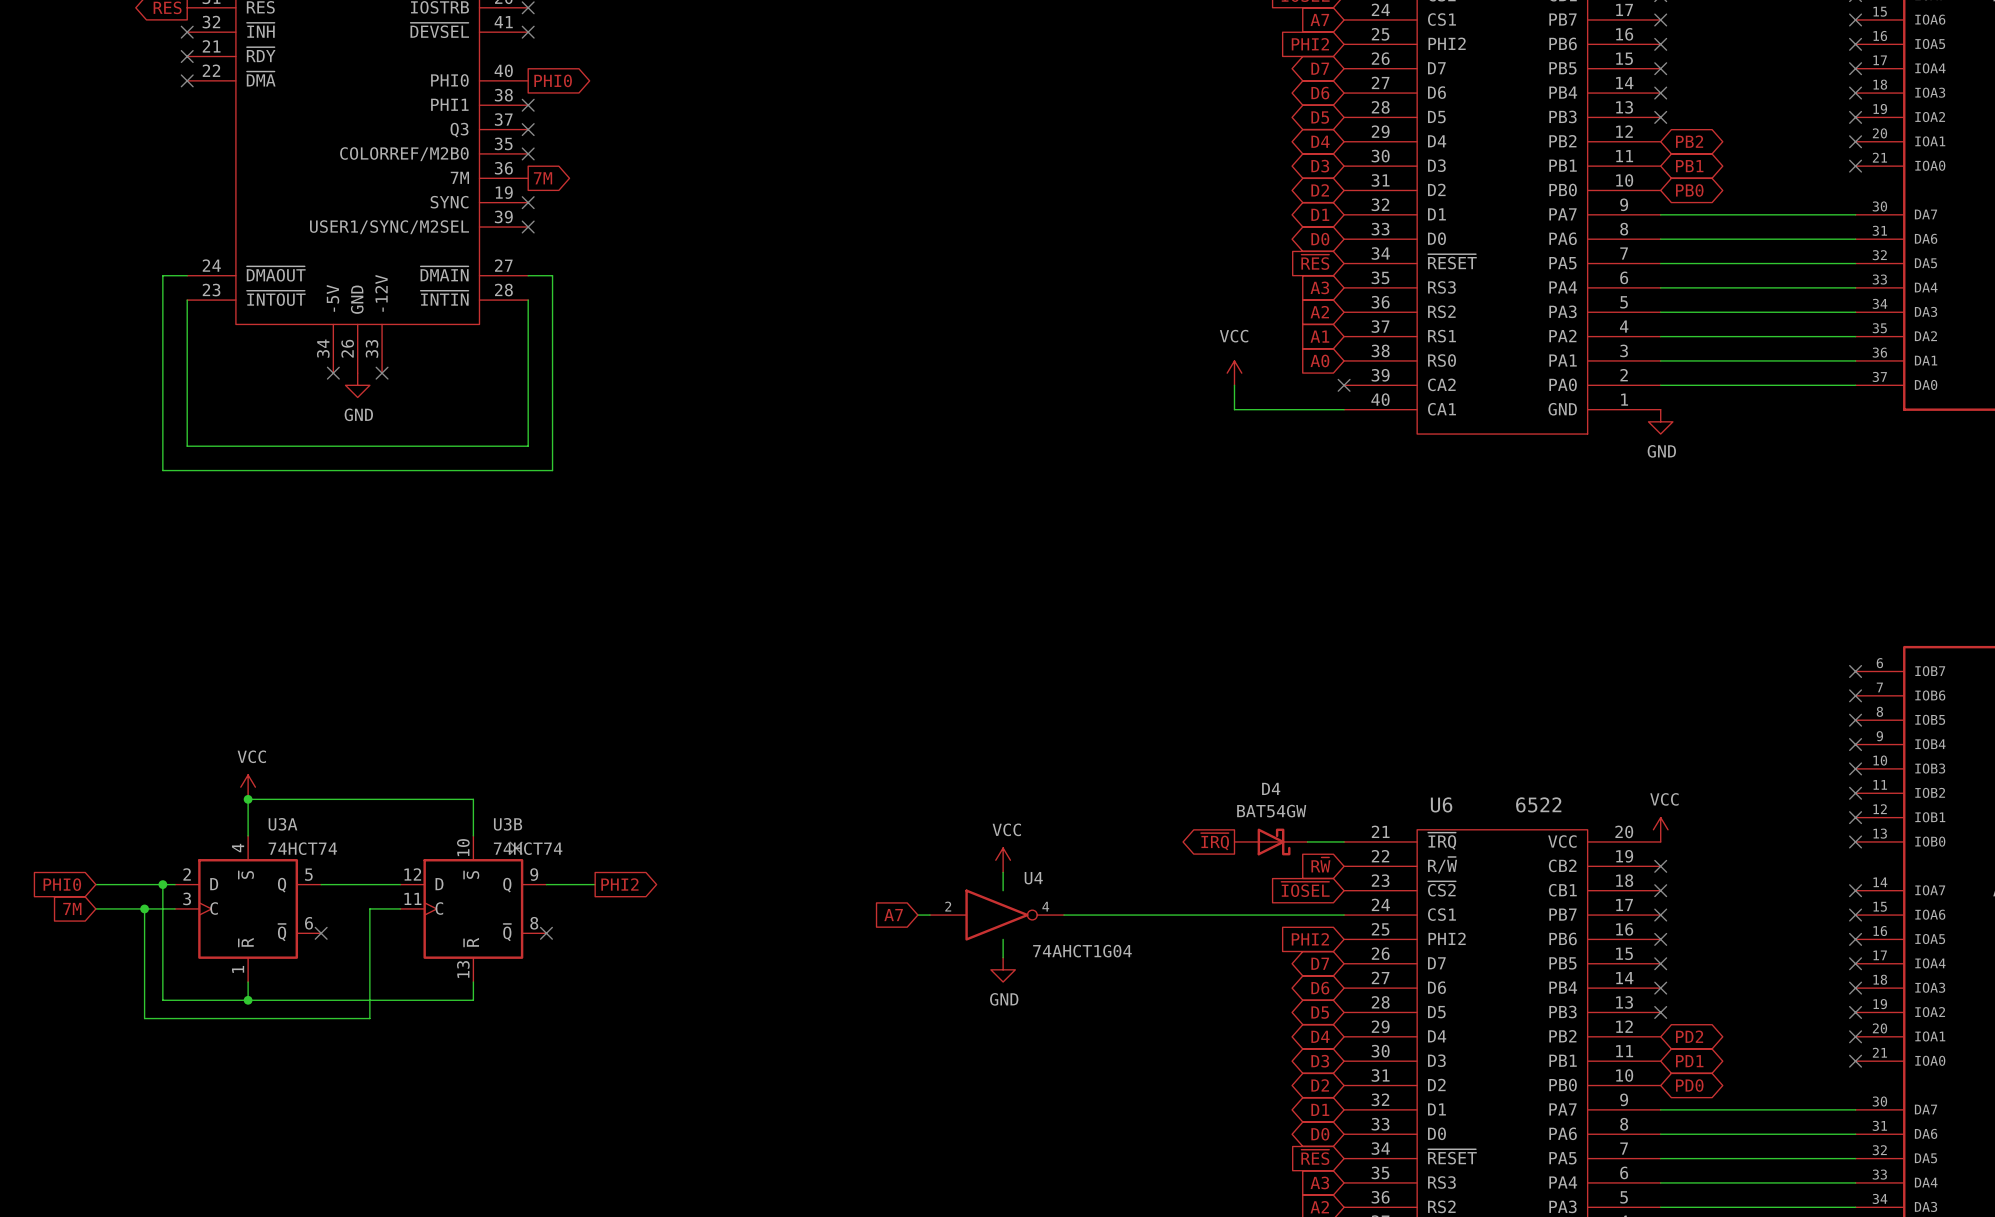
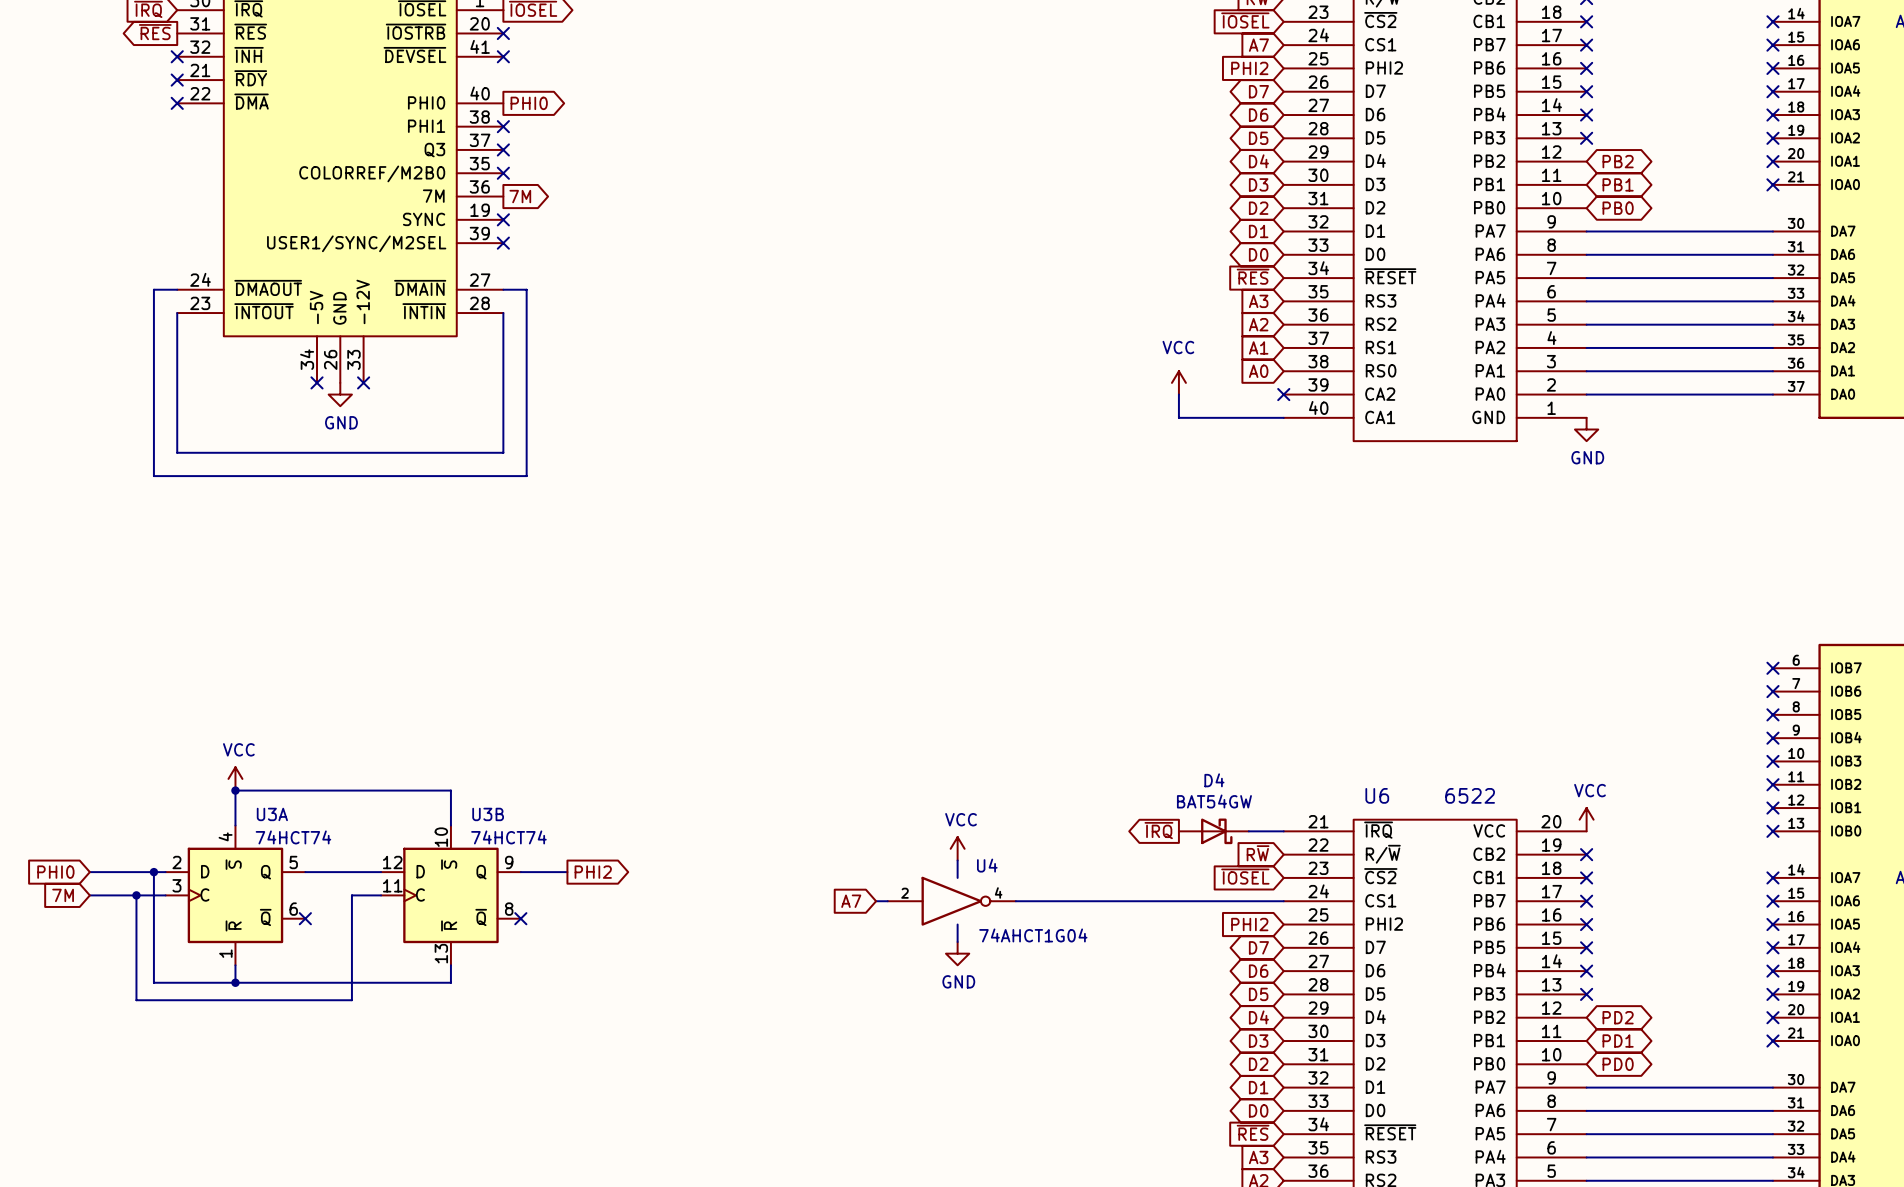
no-connect mark: (516, 848) -> none

